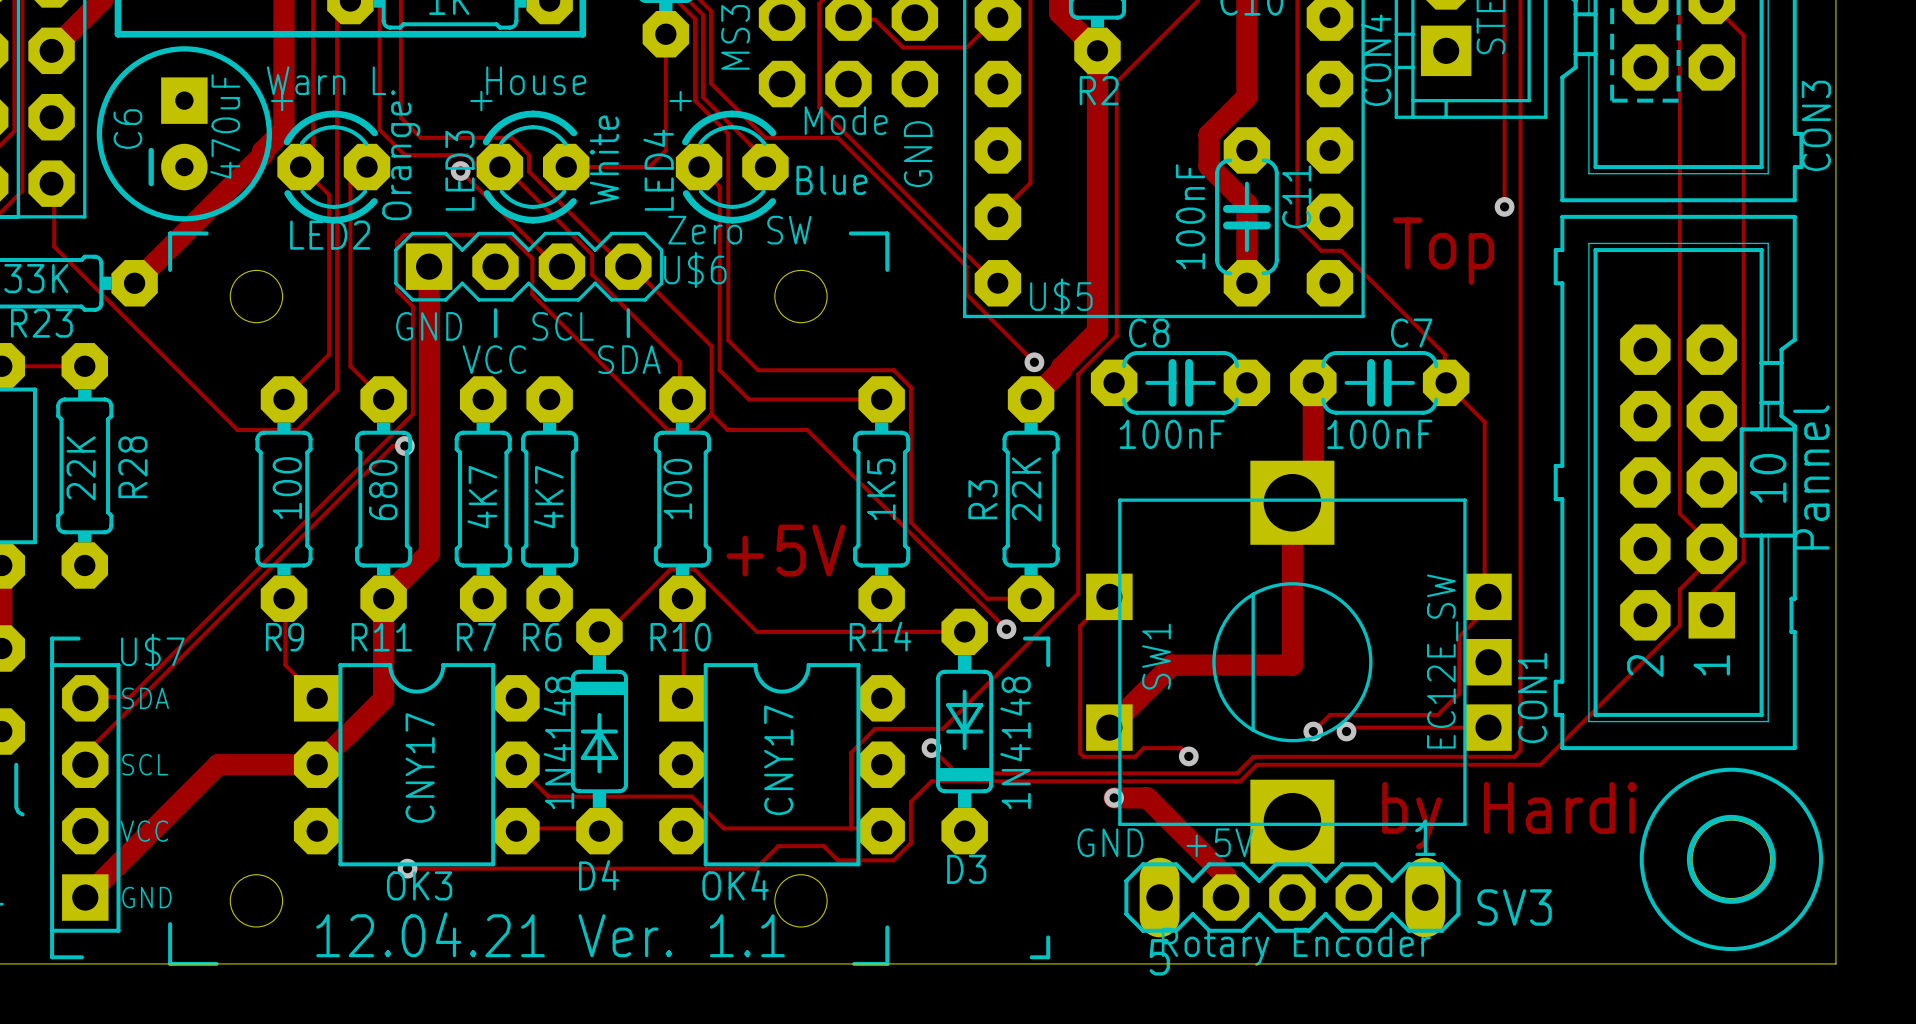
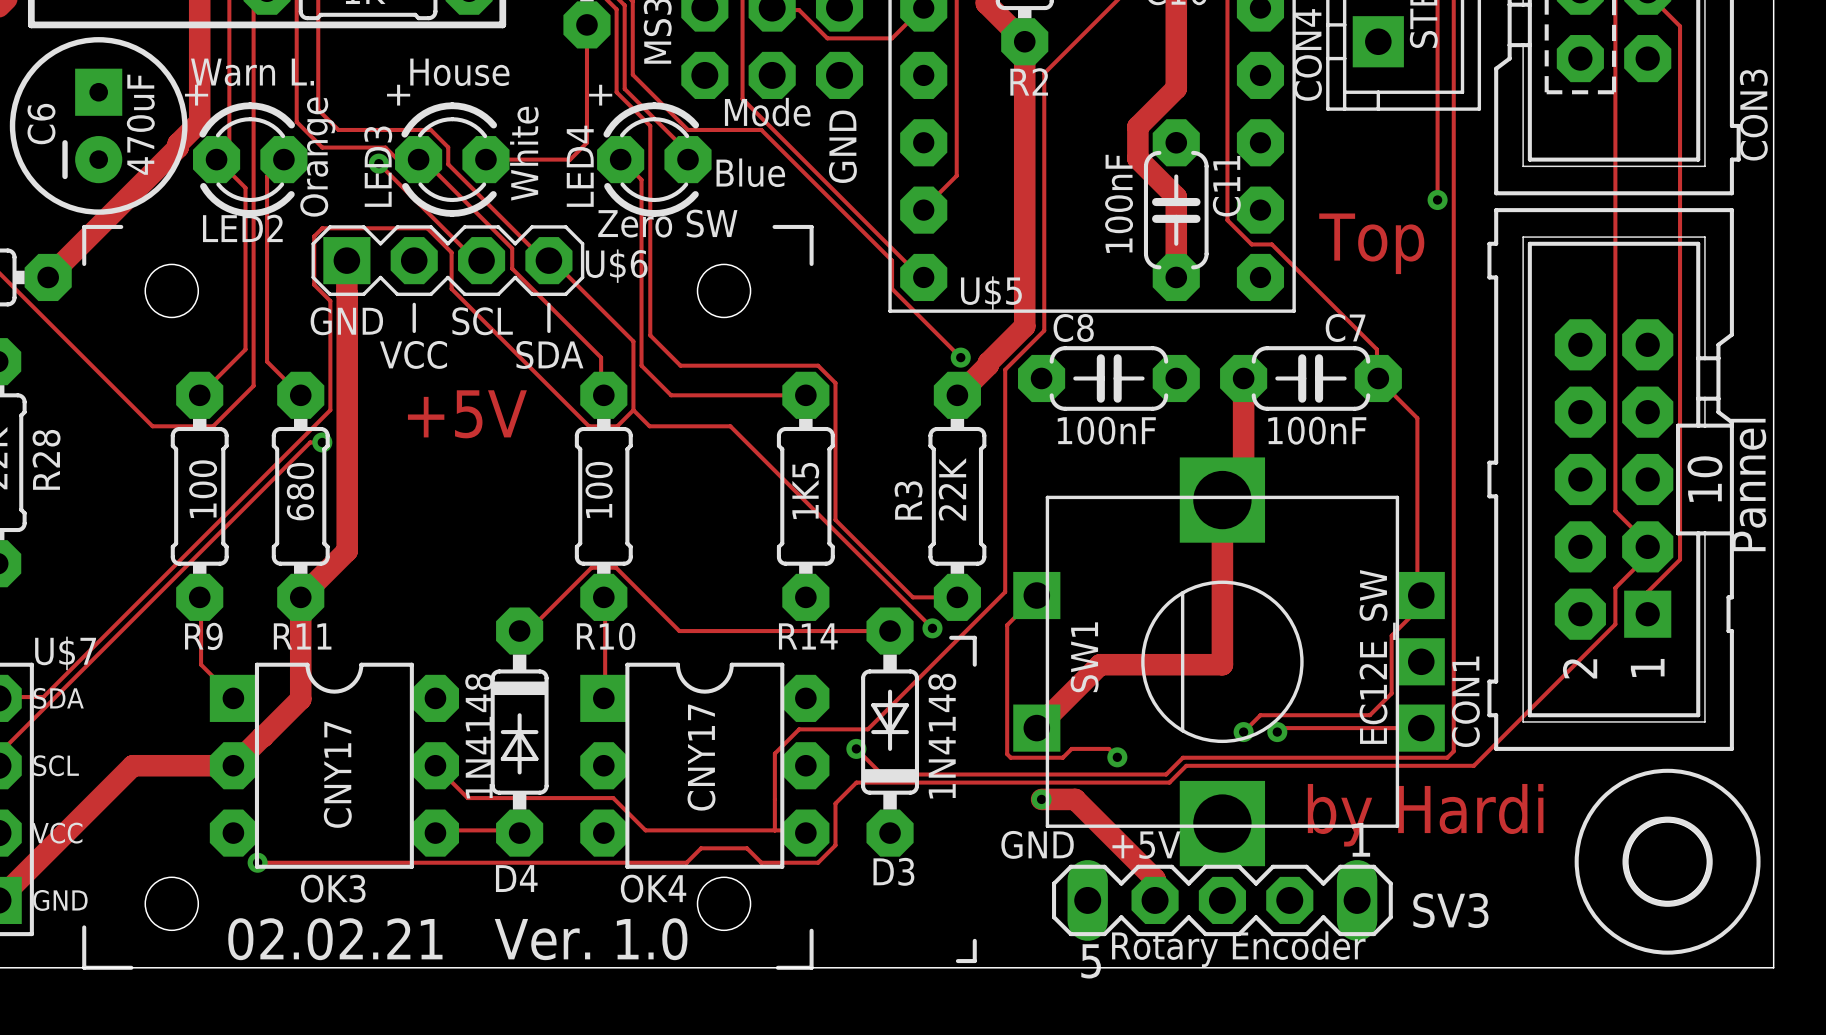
R7: 4K7 (483, 499) -> none
R6: 4K7 (549, 499) -> none
text position: +5V (786, 550) -> +5V (467, 414)
track: (764, 860) (755, 868) (407, 868) -> (686, 862) (257, 862)
via position: (407, 868) -> (257, 862)
text: 12.04.21 (430, 934) -> 02.02.21 (335, 939)
text: Ver. 1.1 (681, 935) -> Ver. 1.0 (591, 939)

